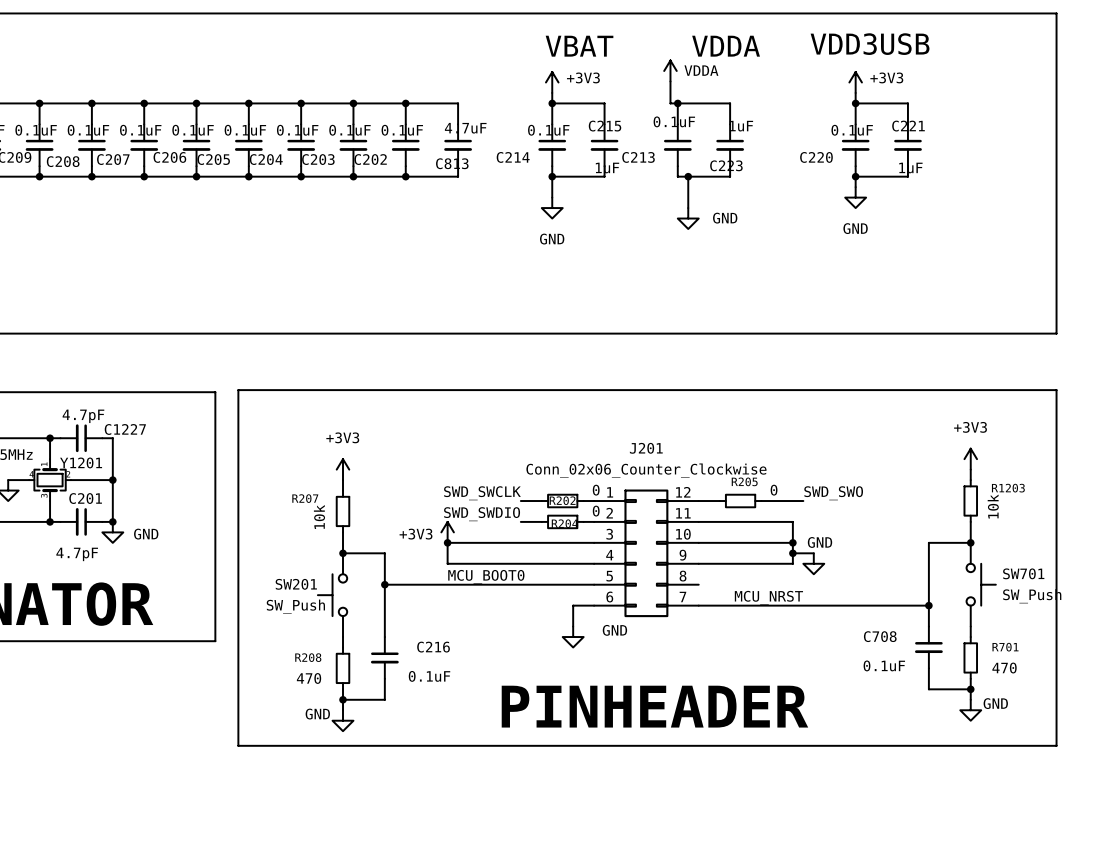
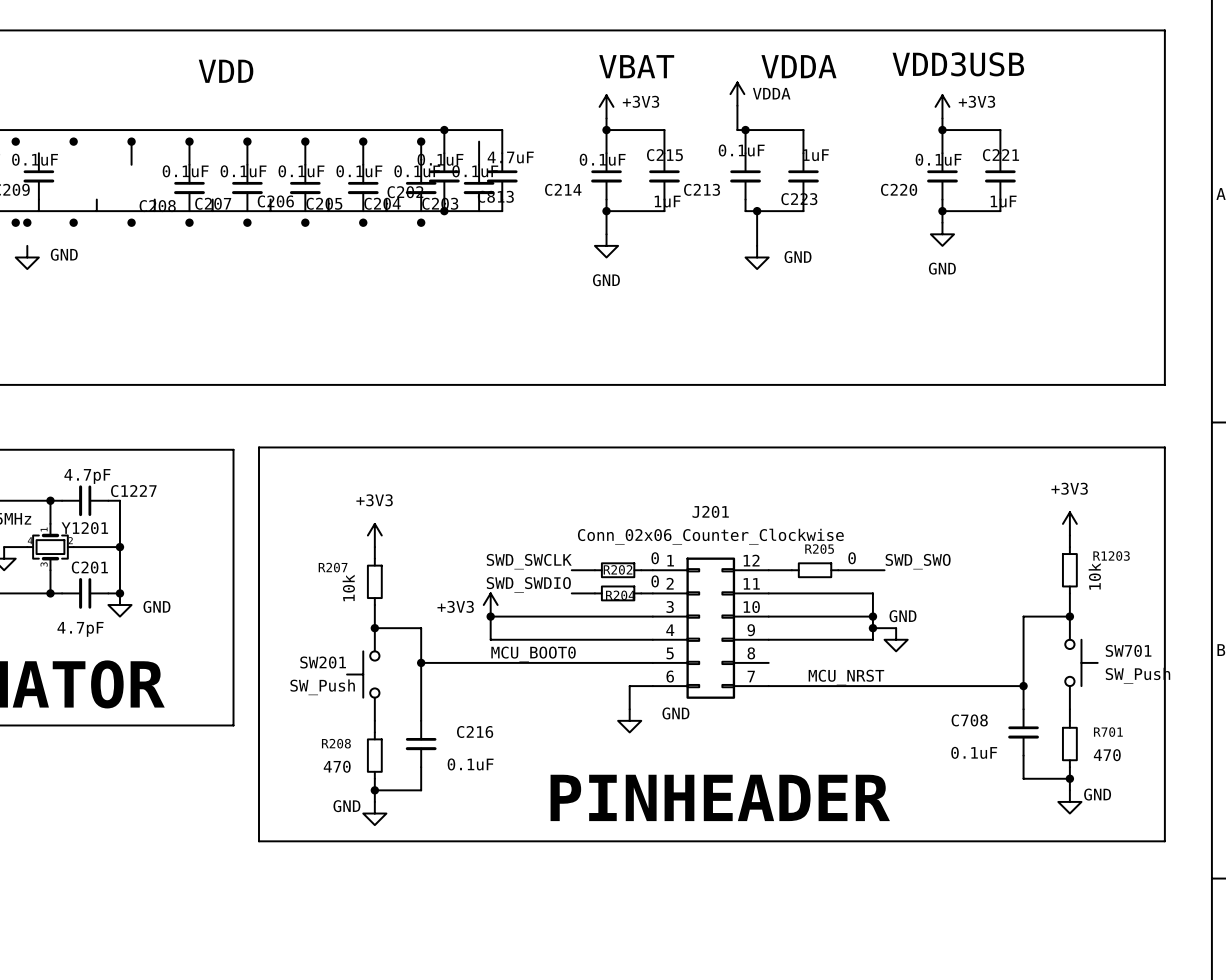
text: none -> VDD (226, 71)
wire: (39, 103) (39, 124) -> (131, 141) (131, 164)
junction: (39, 103) -> none
wire: (91, 103) (91, 124) -> (189, 141) (189, 164)
junction: (91, 103) -> none
wire: (144, 103) (144, 124) -> (247, 141) (247, 164)
junction: (144, 103) -> none
wire: (196, 103) (196, 124) -> (305, 141) (305, 164)
junction: (196, 103) -> none
wire: (248, 103) (248, 124) -> (363, 141) (363, 164)
junction: (248, 103) -> none
wire: (301, 103) (301, 124) -> (421, 141) (421, 164)
junction: (301, 103) -> none
wire: (353, 103) (353, 124) -> (479, 141) (479, 164)
junction: (353, 103) -> none
junction: none -> (15, 141)
junction: none -> (73, 141)
junction: none -> (131, 141)
junction: none -> (189, 141)
junction: none -> (247, 141)
junction: none -> (305, 141)
junction: none -> (363, 141)
junction: none -> (421, 141)
C208 position: (91, 145) -> (189, 187)
C207 position: (144, 145) -> (247, 187)
C206 position: (196, 145) -> (305, 187)
C205 position: (248, 145) -> (363, 187)
C204 position: (301, 145) -> (421, 187)
C203 position: (353, 145) -> (479, 187)
junction: (39, 176) -> none
junction: (91, 176) -> none
junction: (144, 176) -> none
junction: (196, 176) -> none
junction: (248, 176) -> none
junction: (301, 176) -> none
junction: (353, 176) -> none
junction: none -> (15, 222)
junction: none -> (27, 222)
junction: none -> (73, 222)
junction: none -> (131, 222)
junction: none -> (189, 222)
junction: none -> (247, 222)
junction: none -> (305, 222)
junction: none -> (363, 222)
junction: none -> (421, 222)
power symbol: none -> GND (27, 257)

